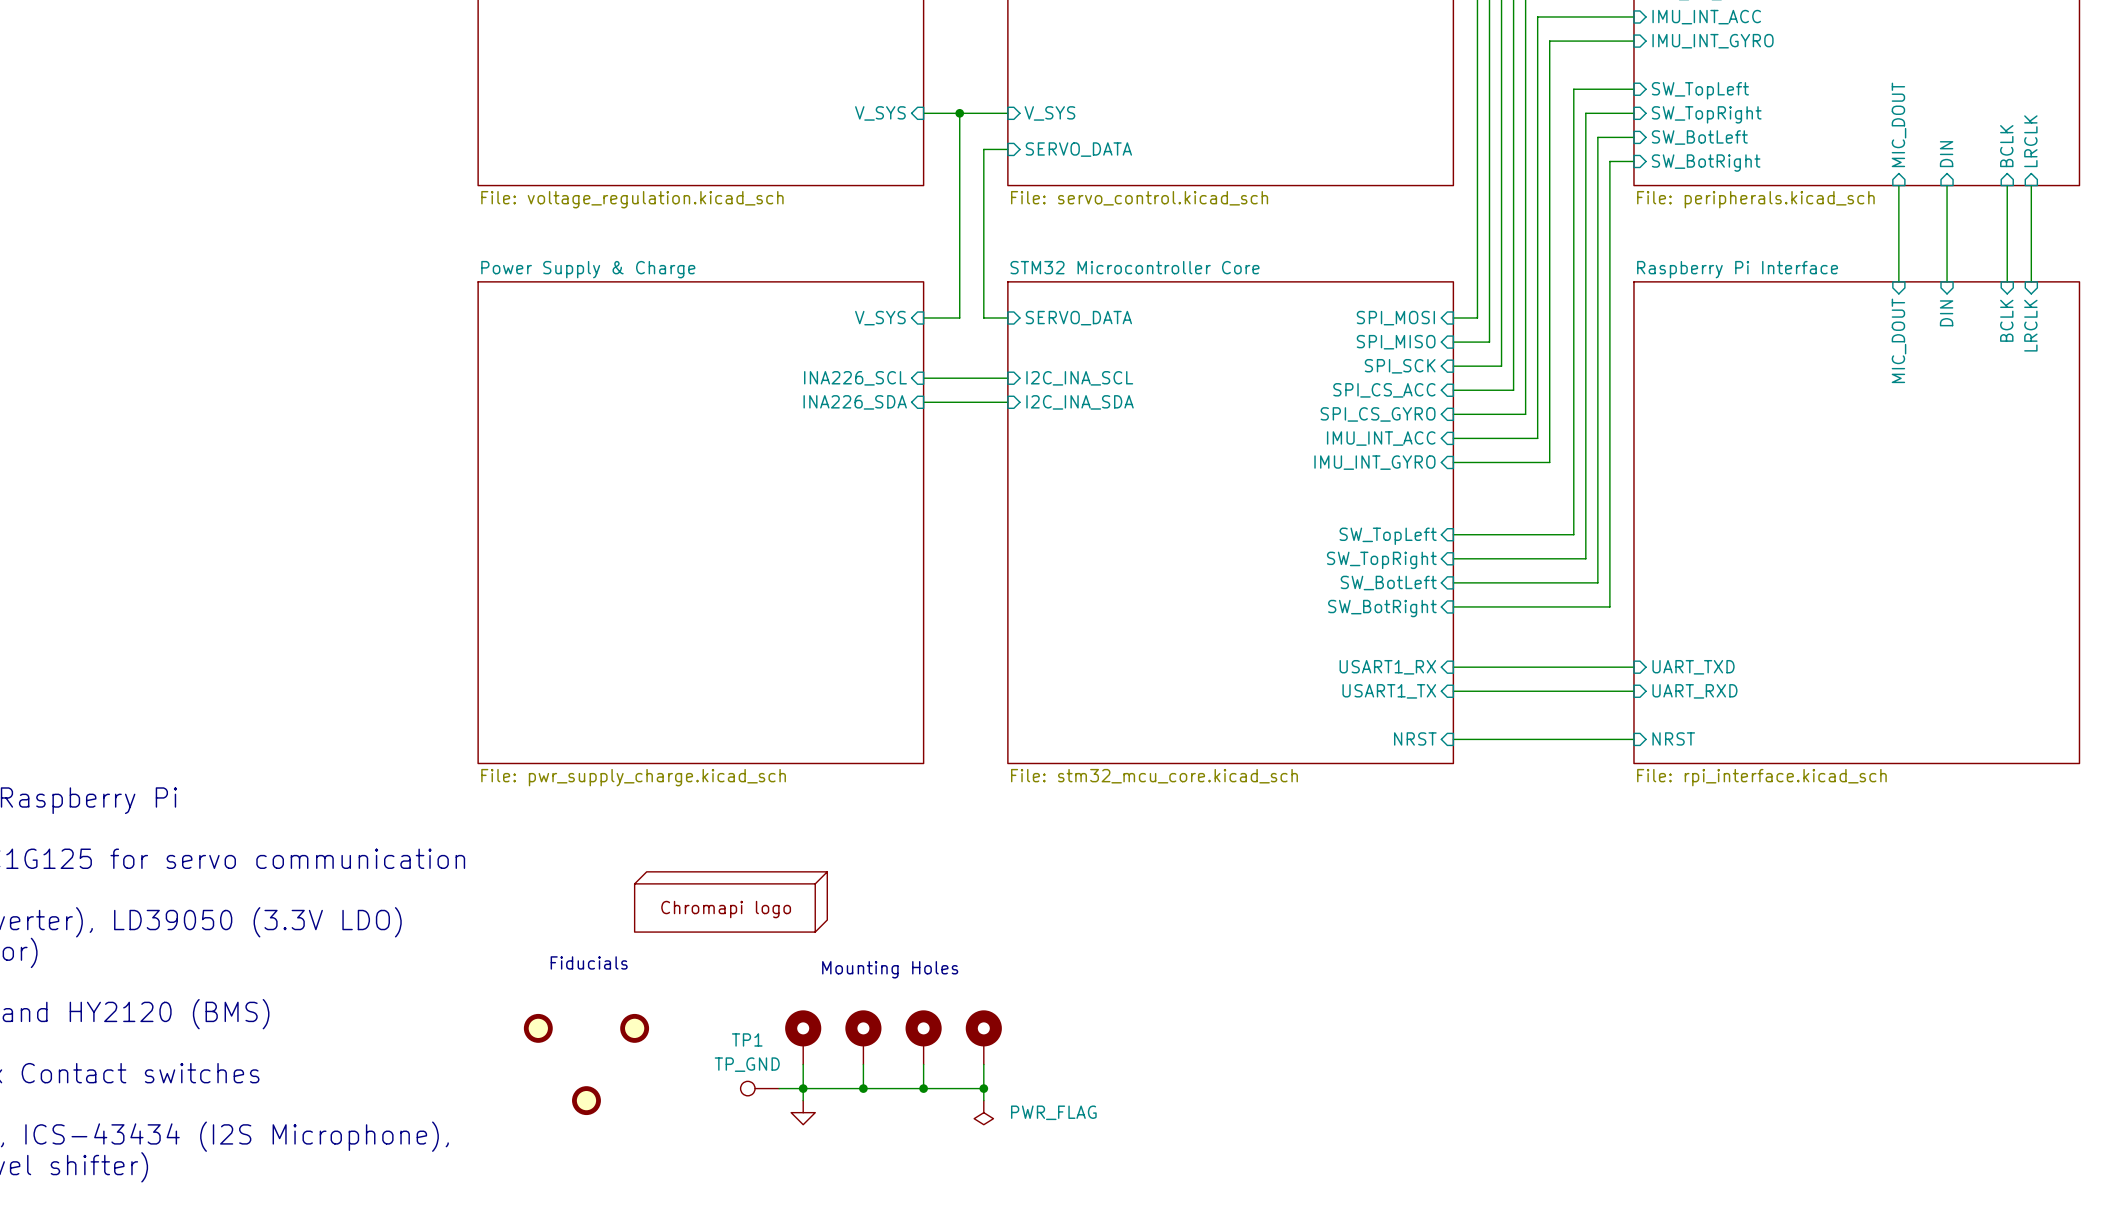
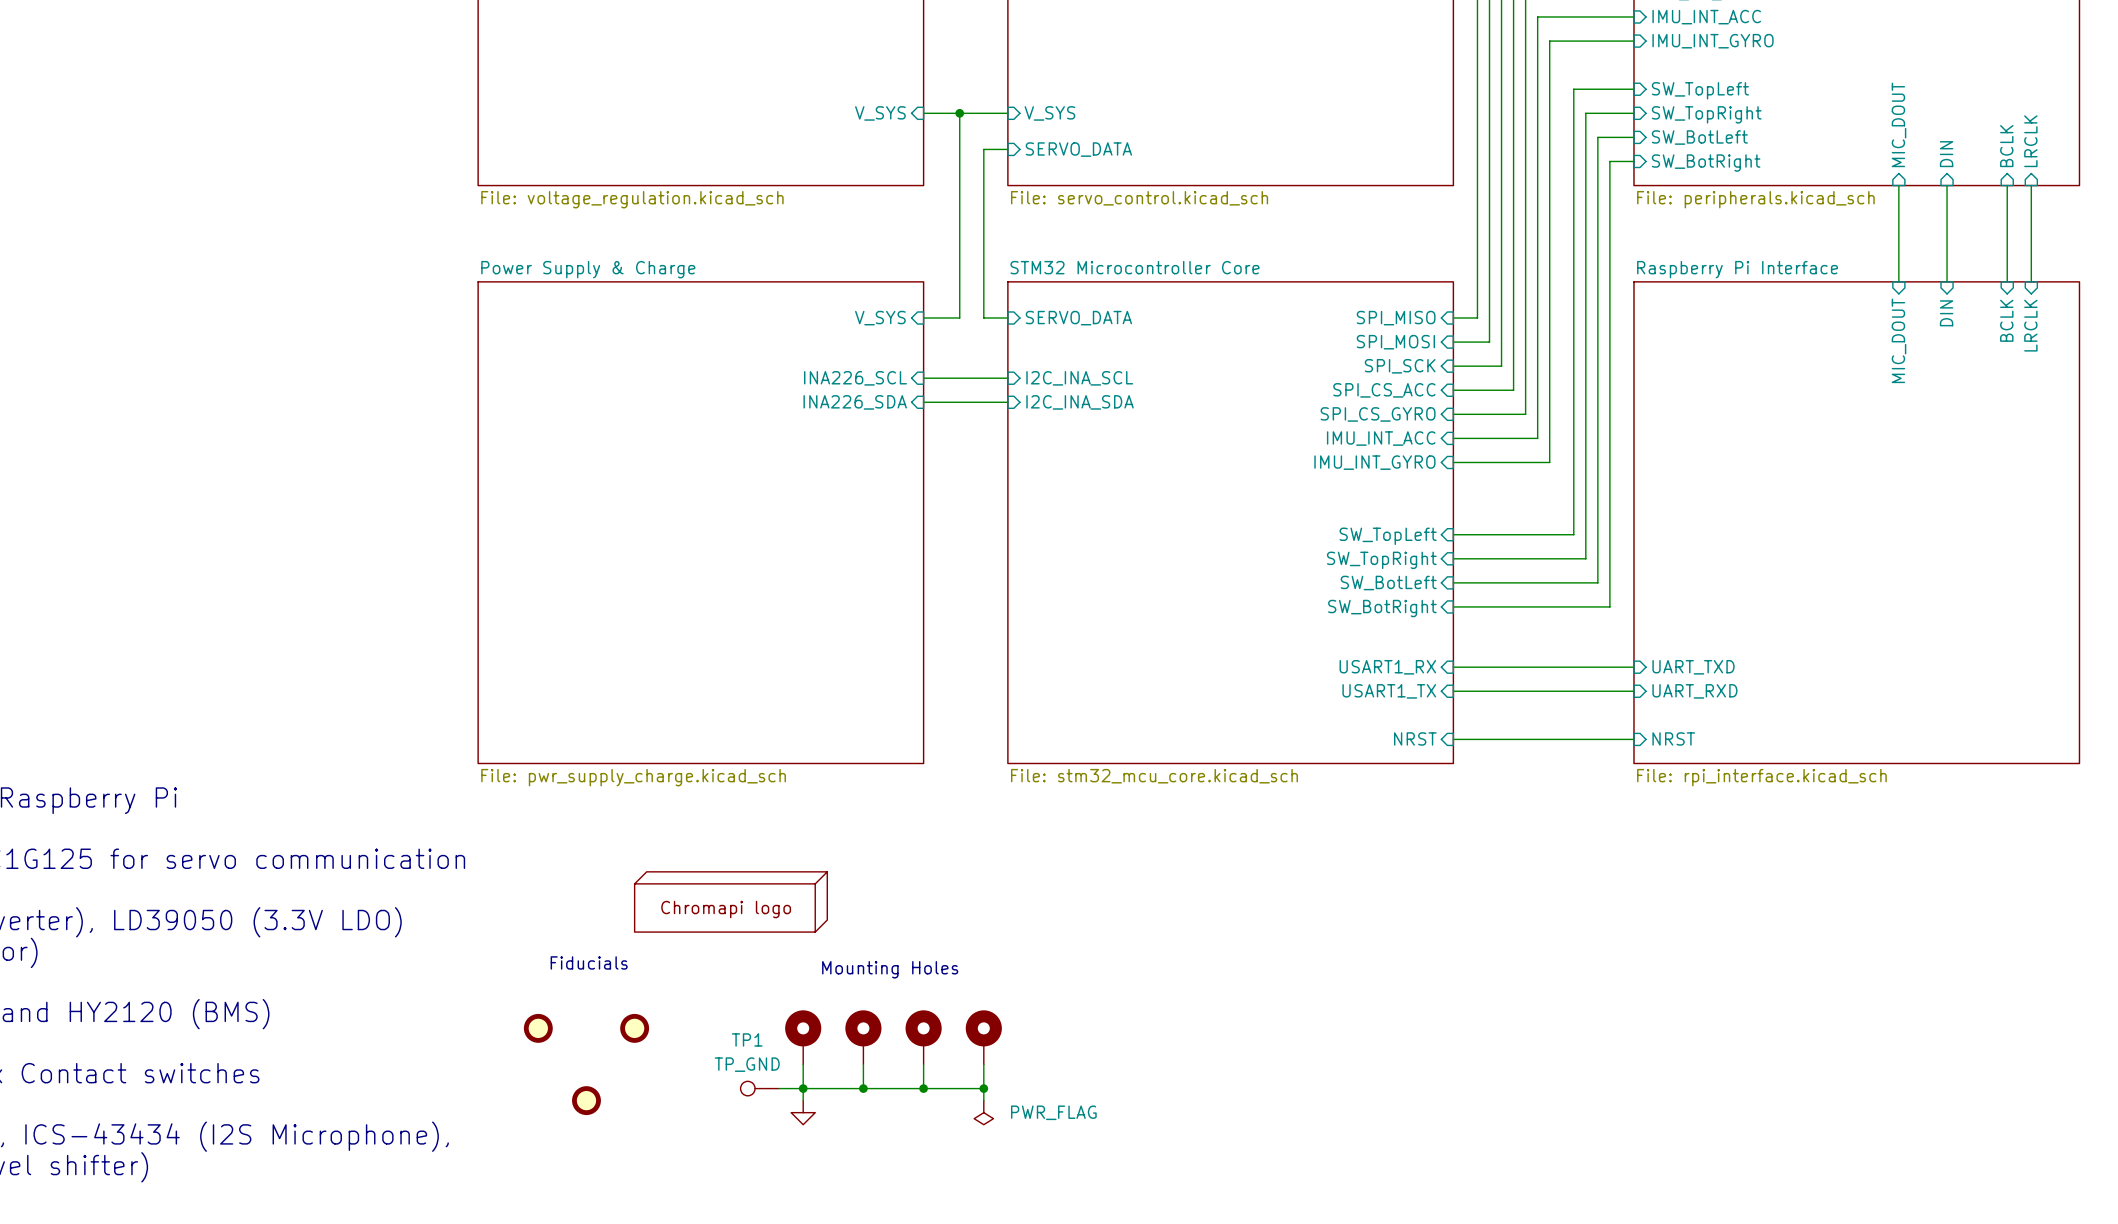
sheet pin: SPI_MOSI (1395, 318) -> SPI_MISO (1396, 318)
sheet pin: SPI_MISO (1396, 342) -> SPI_MOSI (1395, 342)

